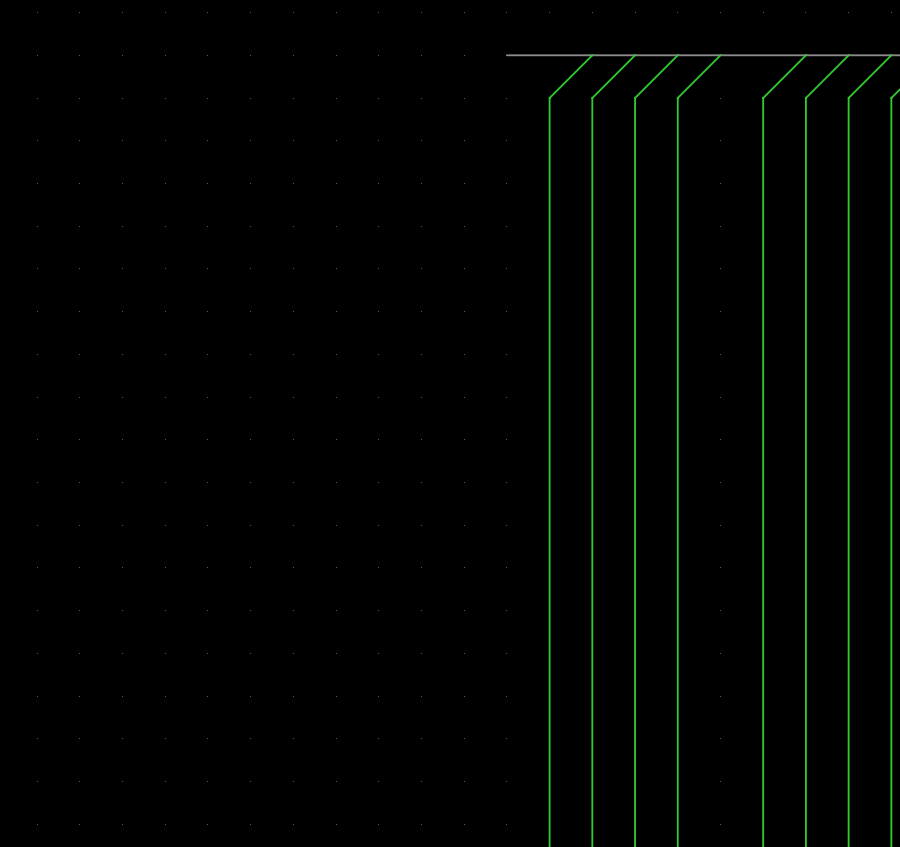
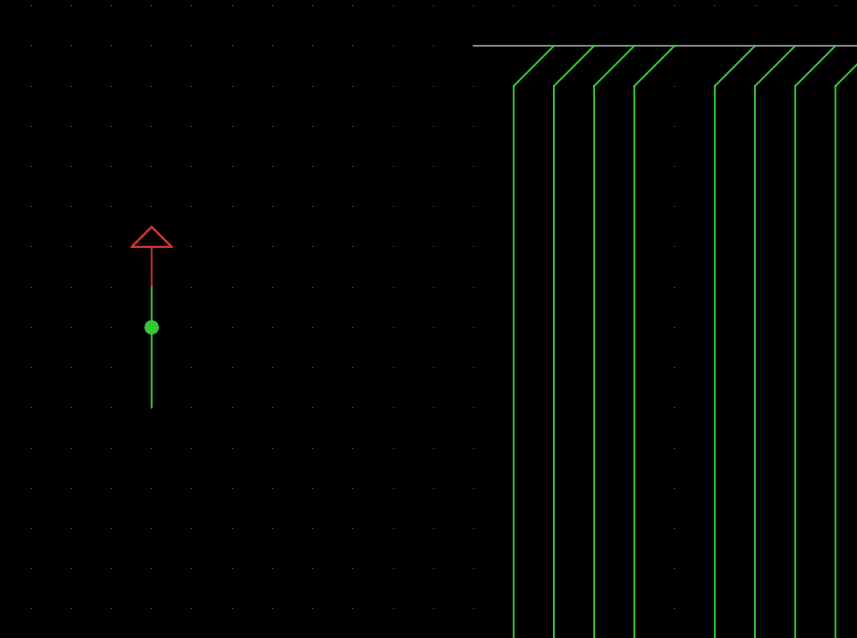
power symbol: none -> (151, 256)
wire: none -> (151, 287) (151, 407)
junction: none -> (151, 327)

